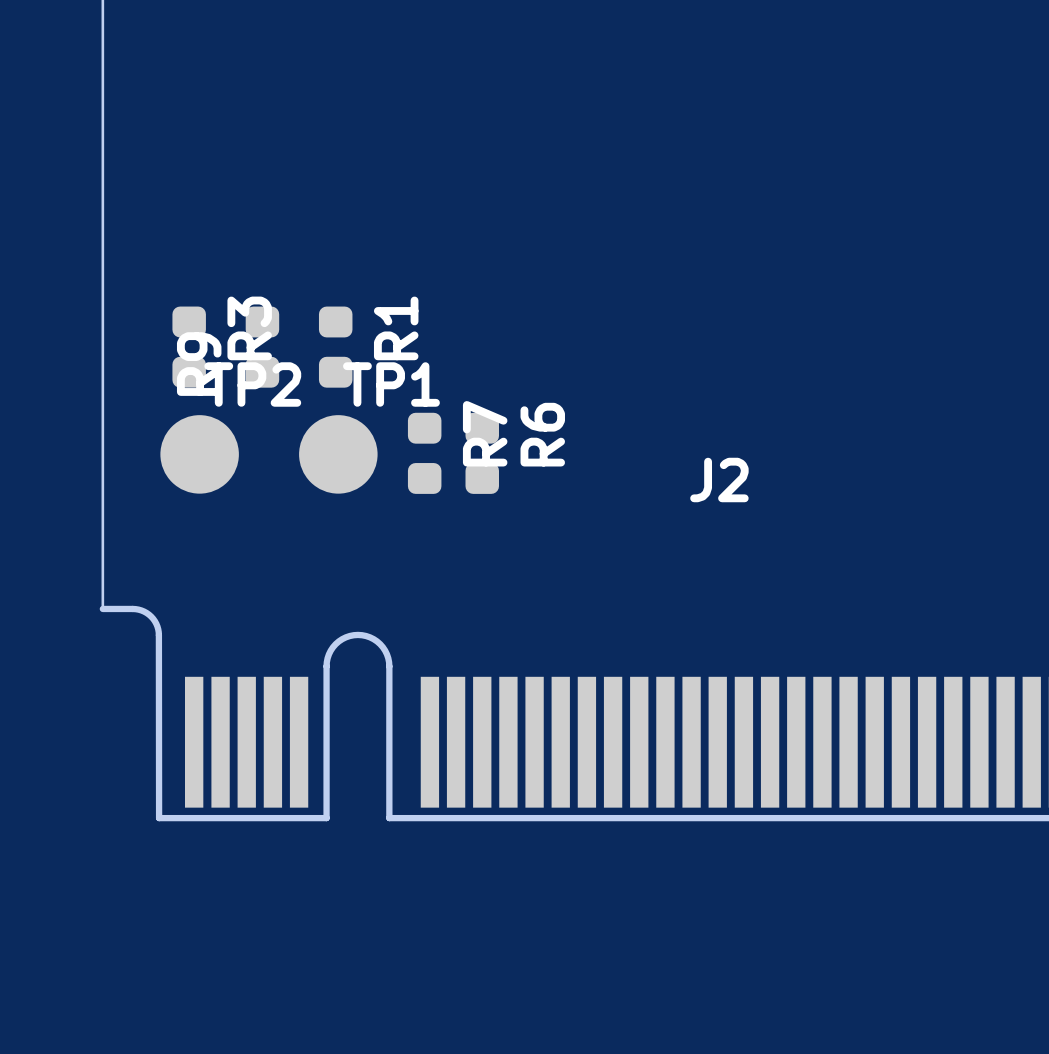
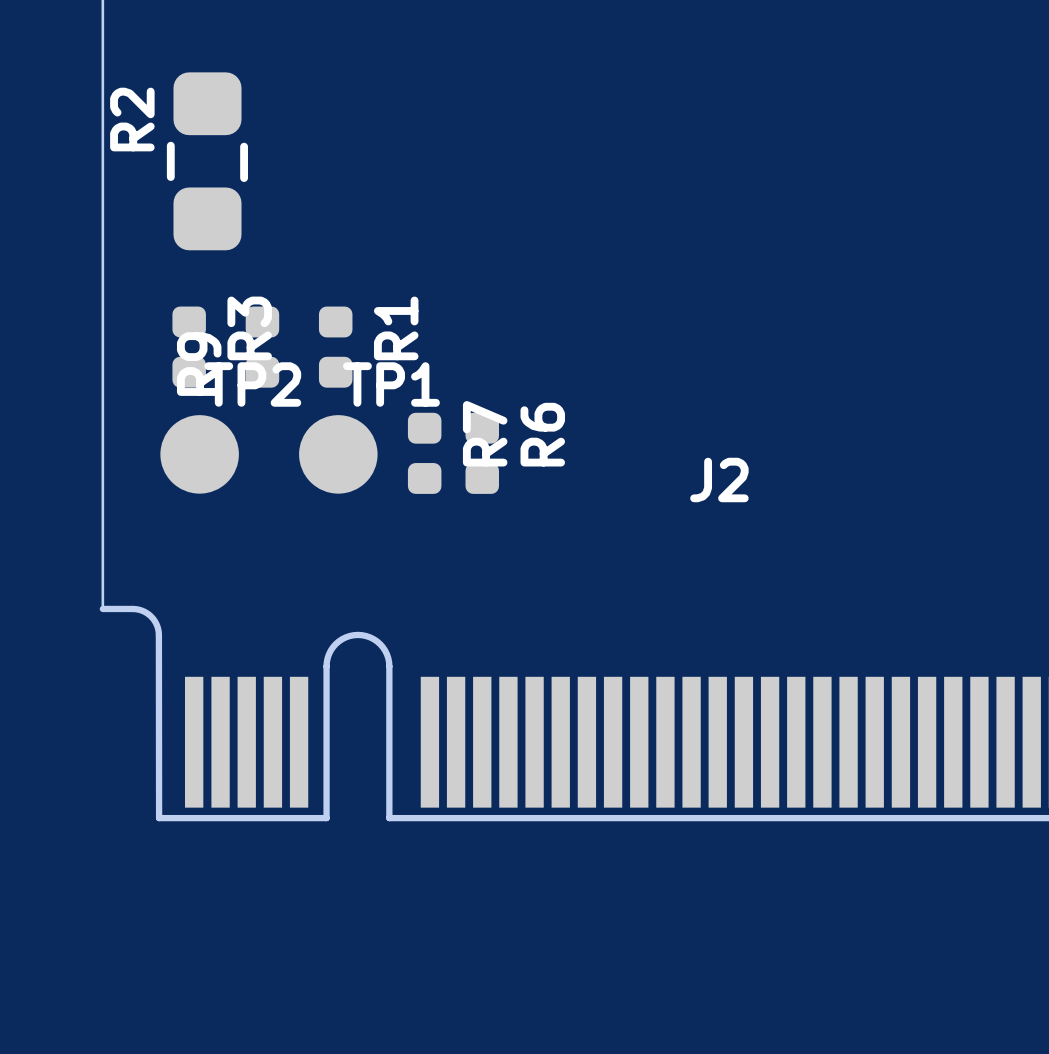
R2: none -> (207, 161)

